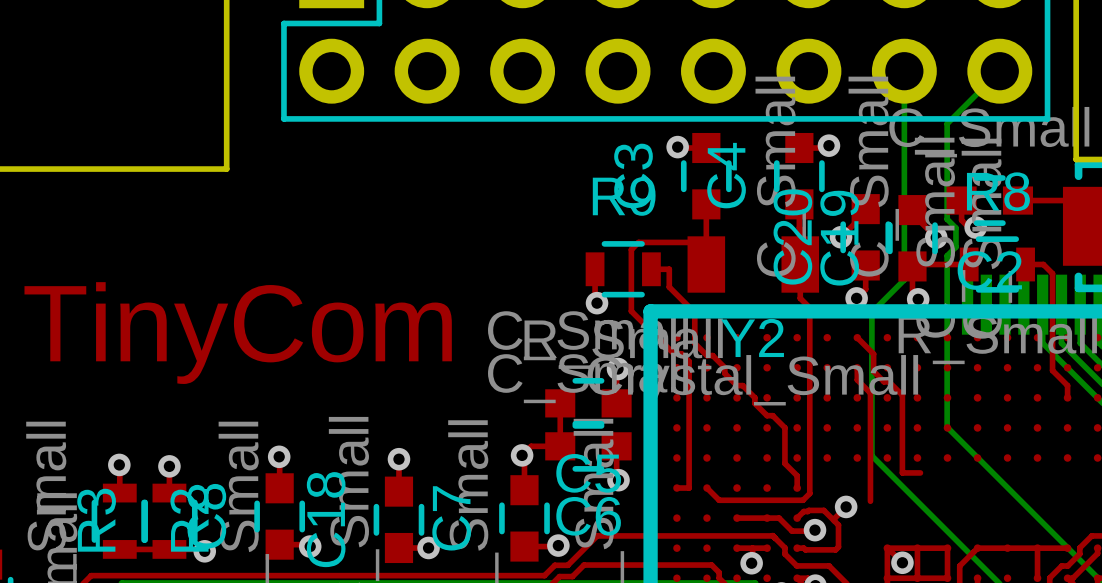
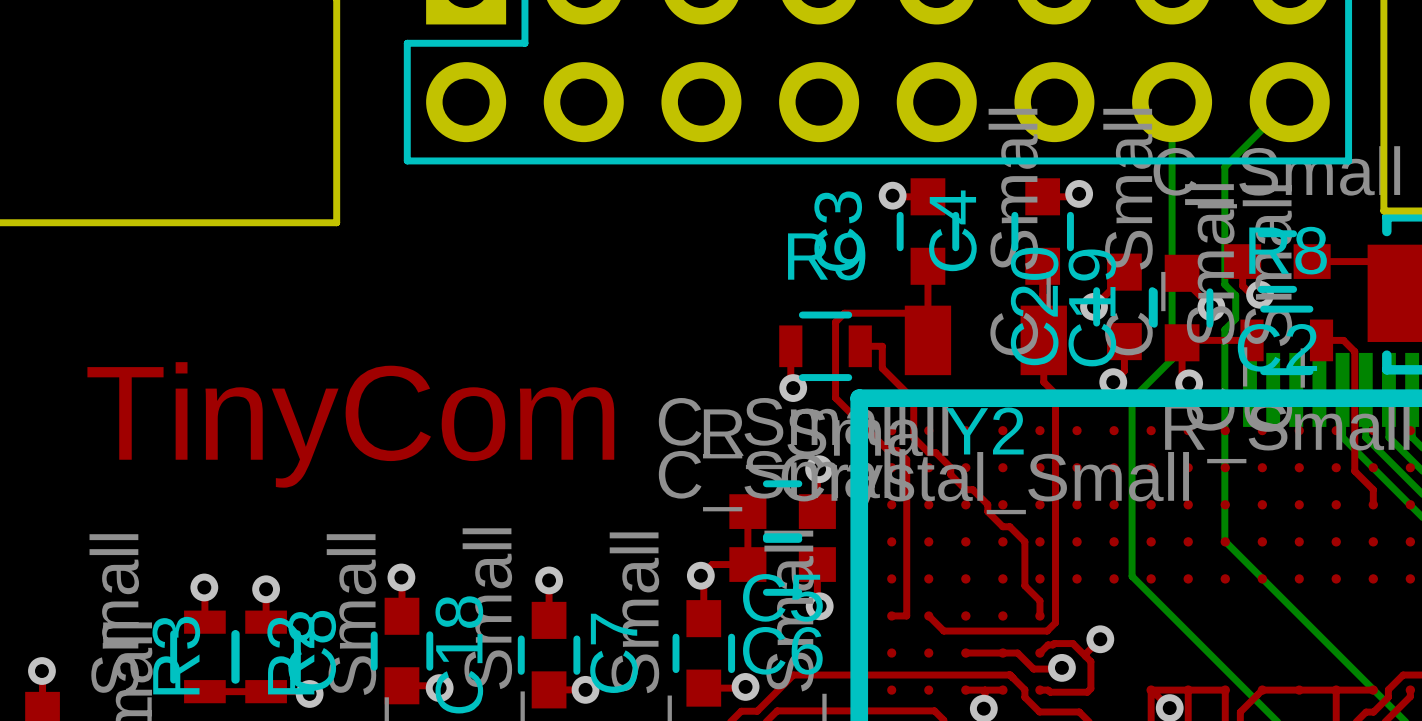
top track: (857, 337) (873, 354) (873, 371) (884, 381) (888, 381) (902, 395) (902, 472) (920, 472) -> none
top track: (857, 367) (857, 379) (870, 393) (870, 501) -> none

